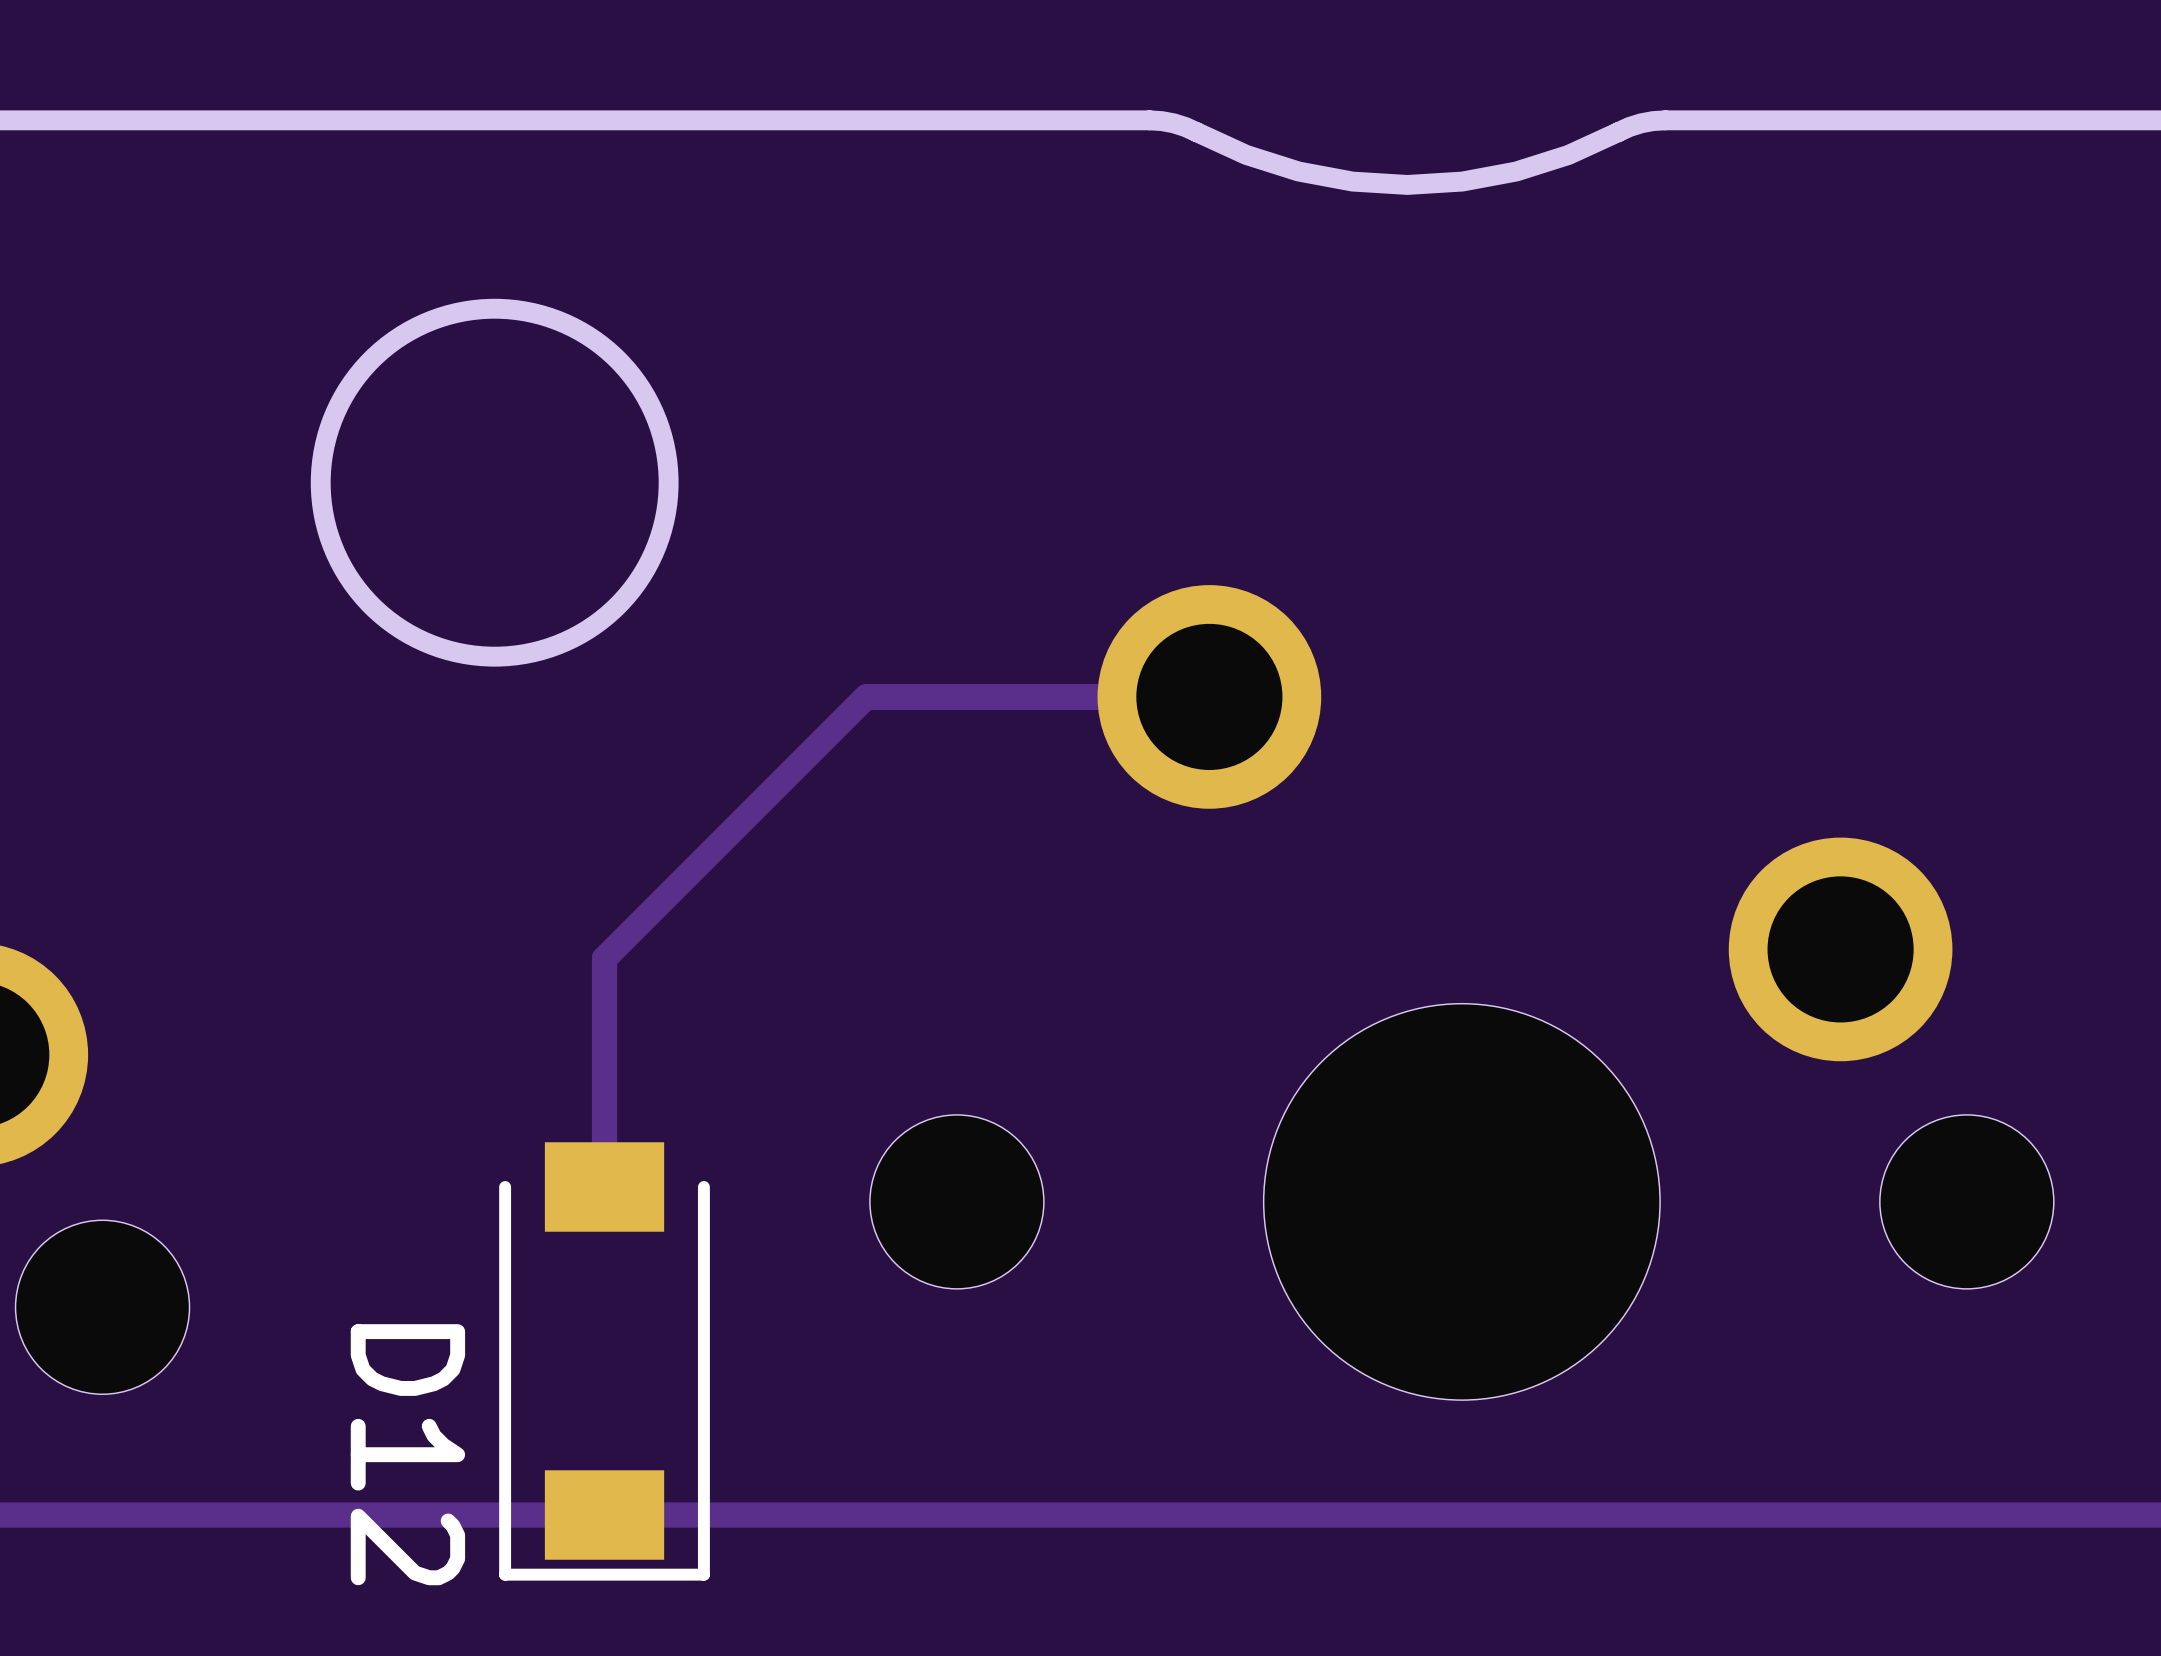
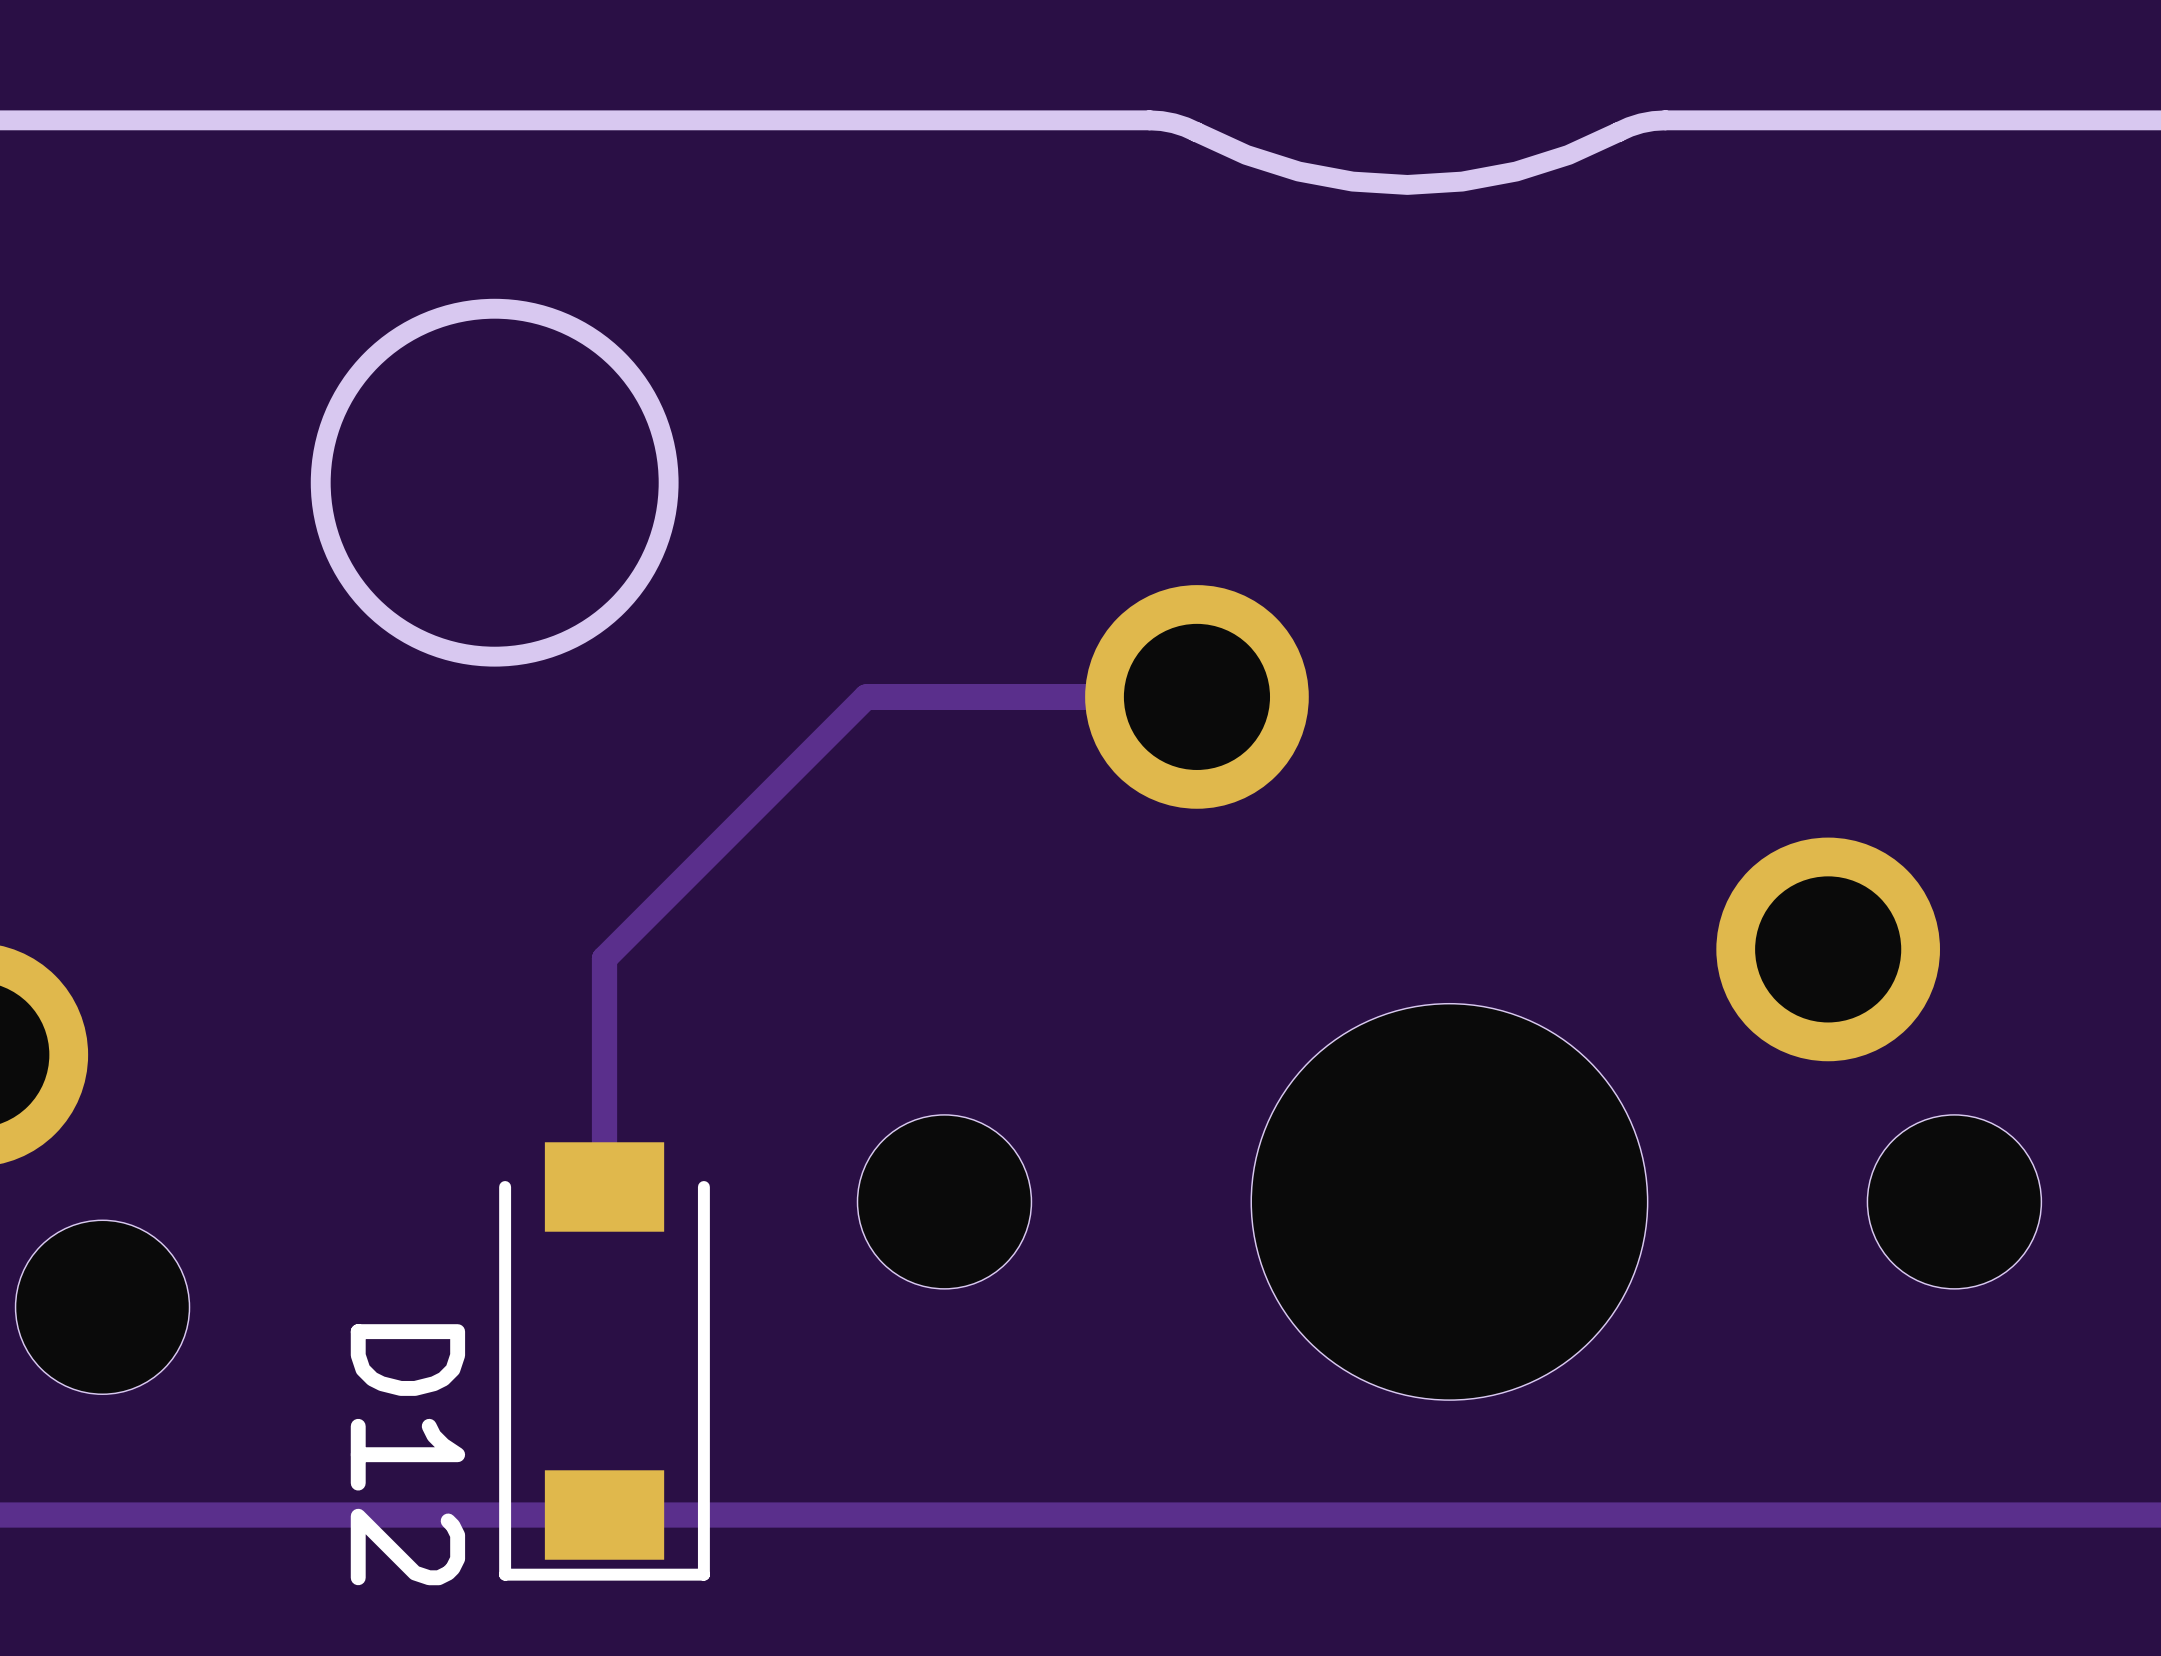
part position: (1461, 992) -> (1449, 992)

